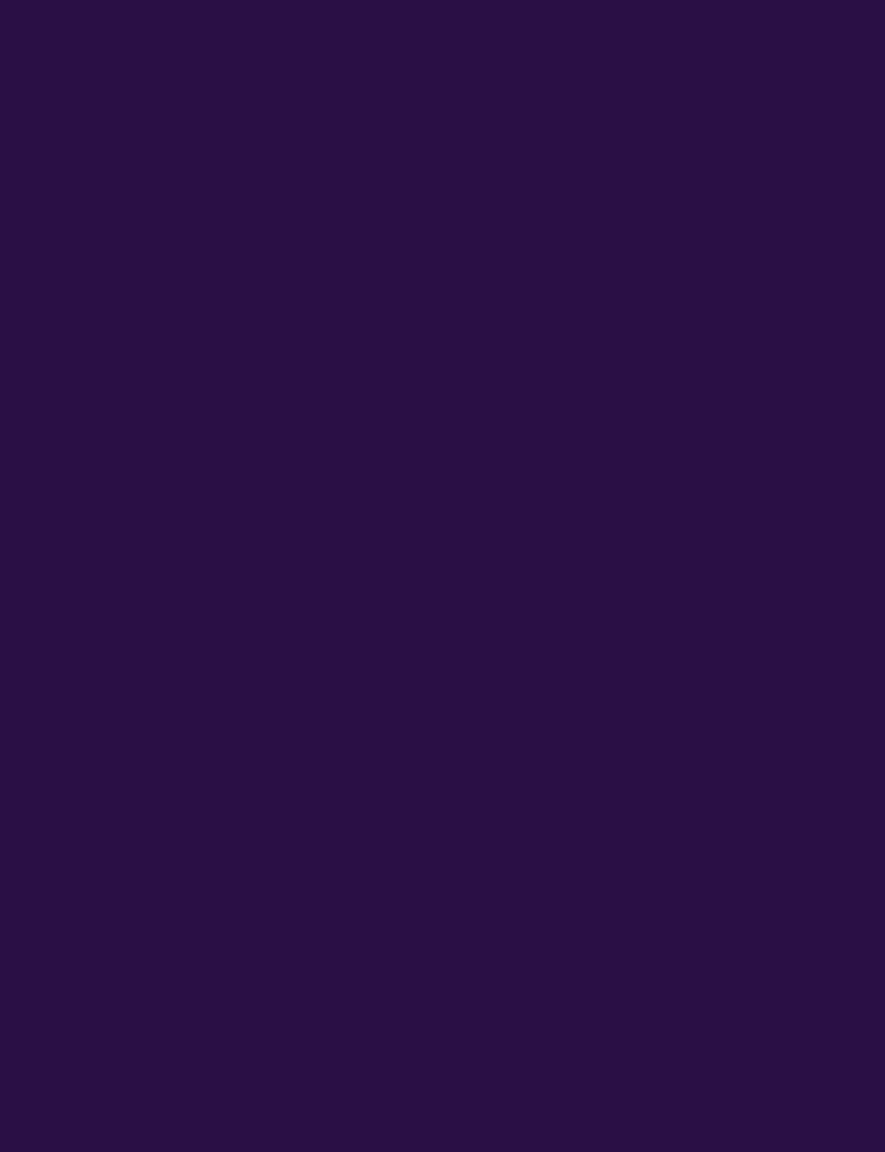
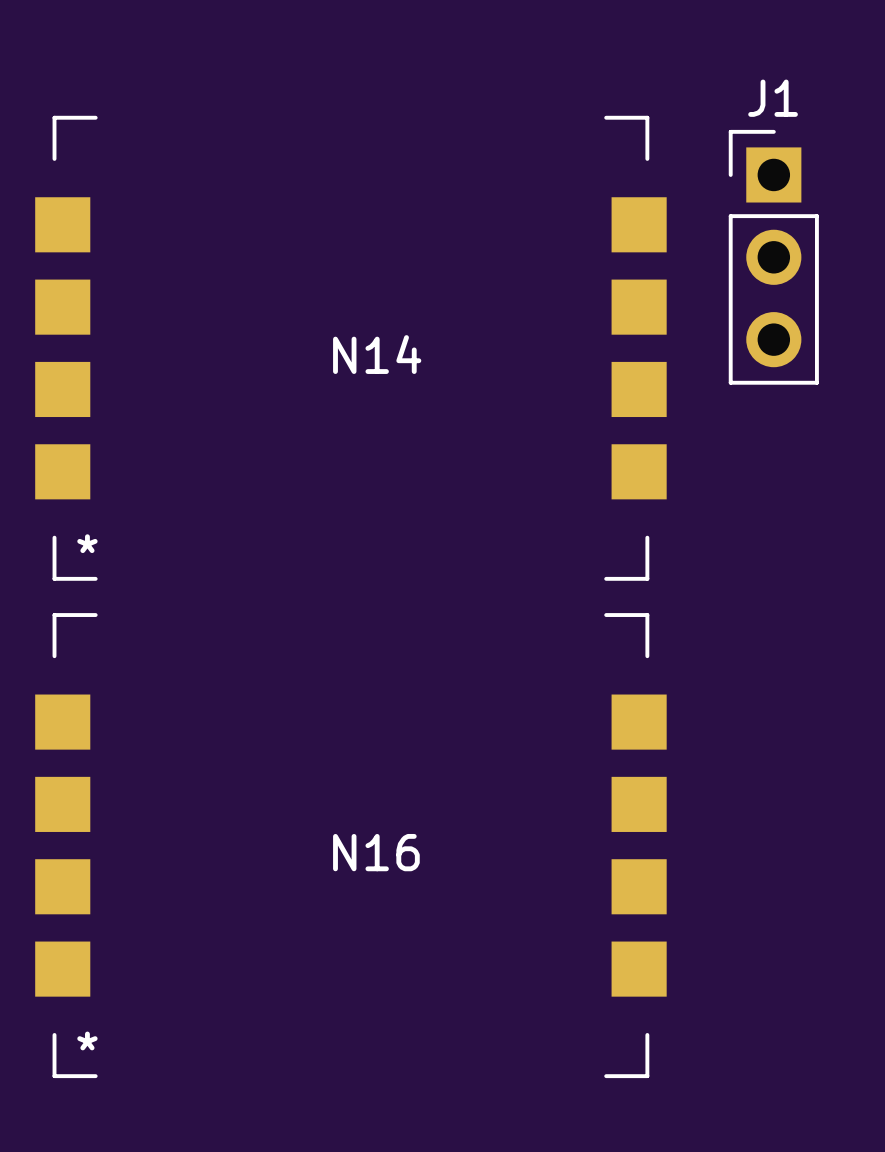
J1: none -> (773, 257)
N14: none -> (350, 348)
N16: none -> (350, 845)

